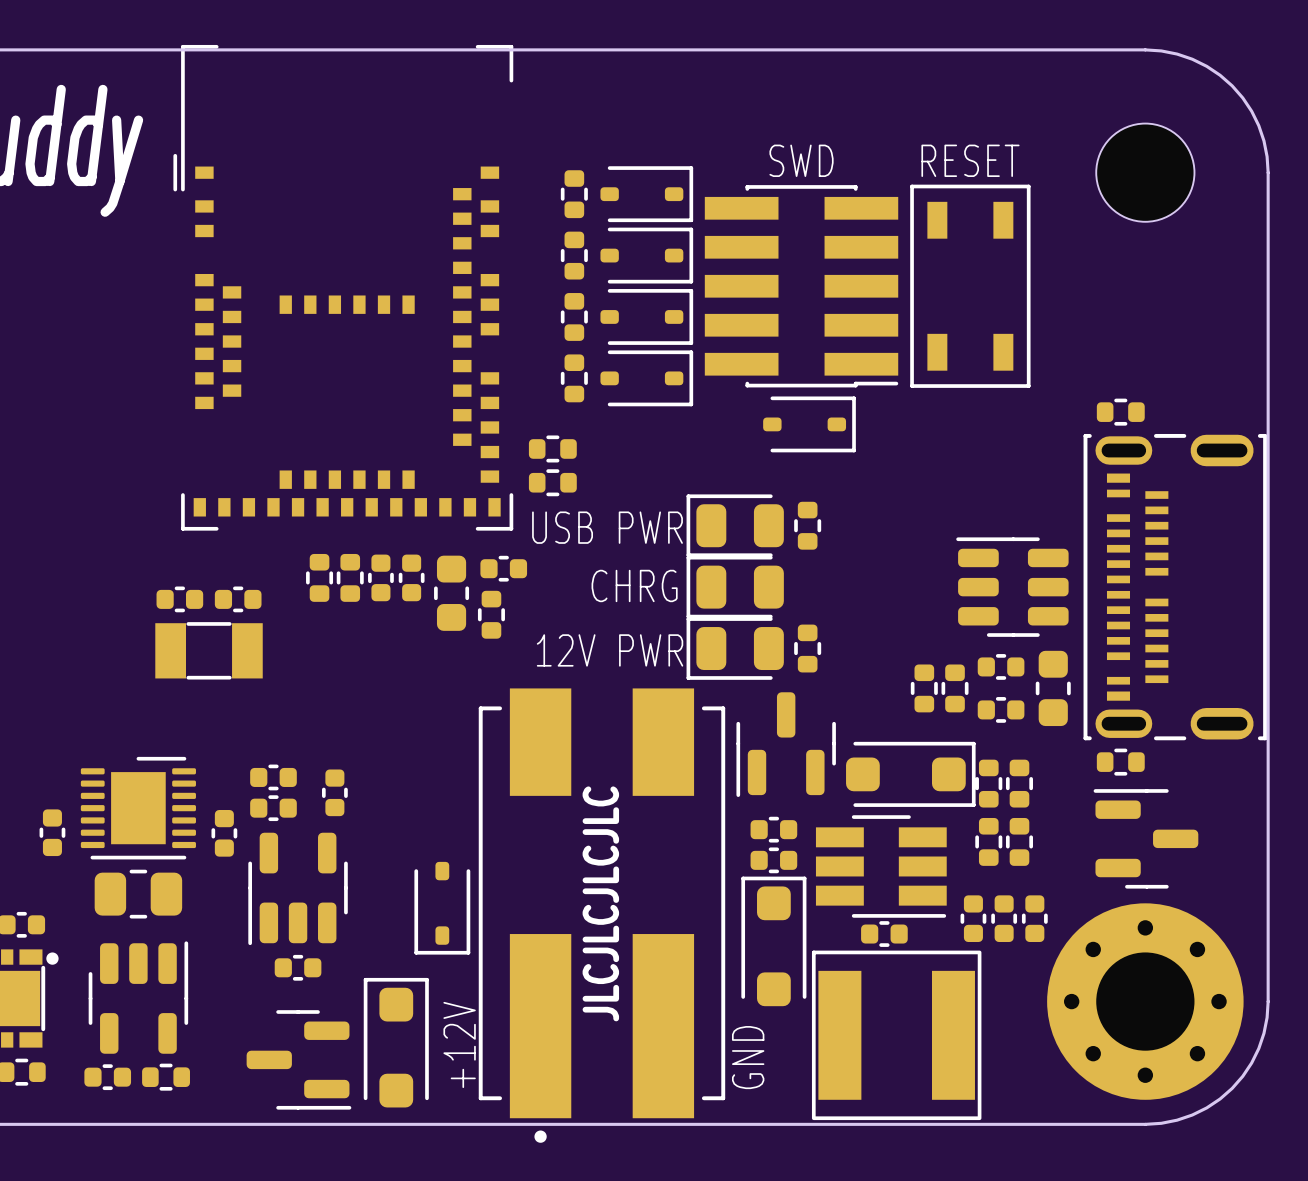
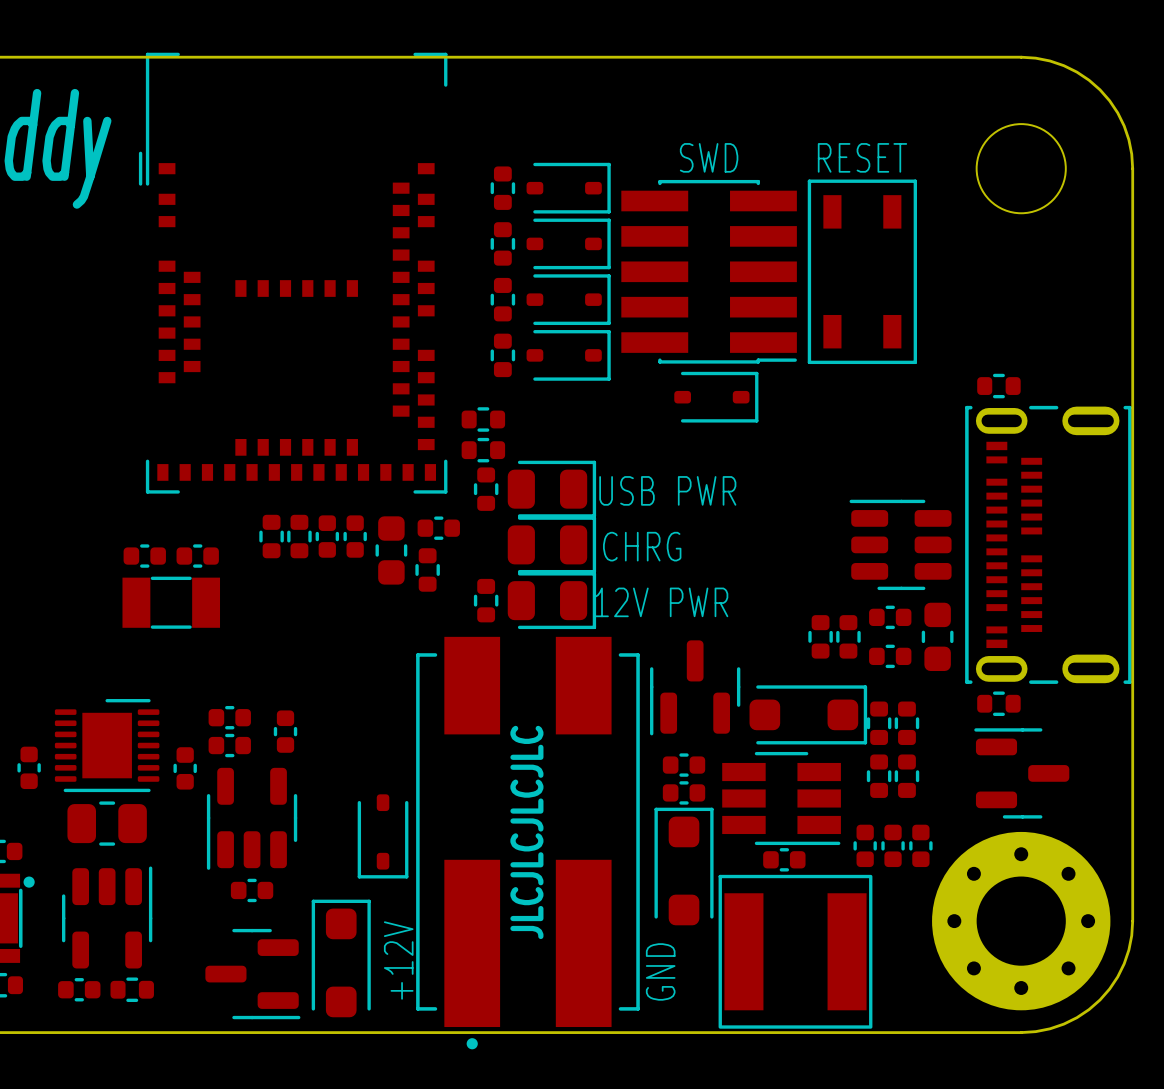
part: none -> (486, 489)
part: none -> (551, 489)
part: (735, 525) -> none
part: (807, 525) -> none
text position: USB PWR (607, 527) -> USB PWR (667, 490)
text position: CHRG (634, 585) -> CHRG (642, 546)
part: none -> (551, 544)
part: (735, 587) -> none
part: none -> (486, 600)
part: none -> (551, 600)
part: (735, 648) -> none
part: (807, 648) -> none
text position: 12V PWR (610, 650) -> 12V PWR (661, 602)

